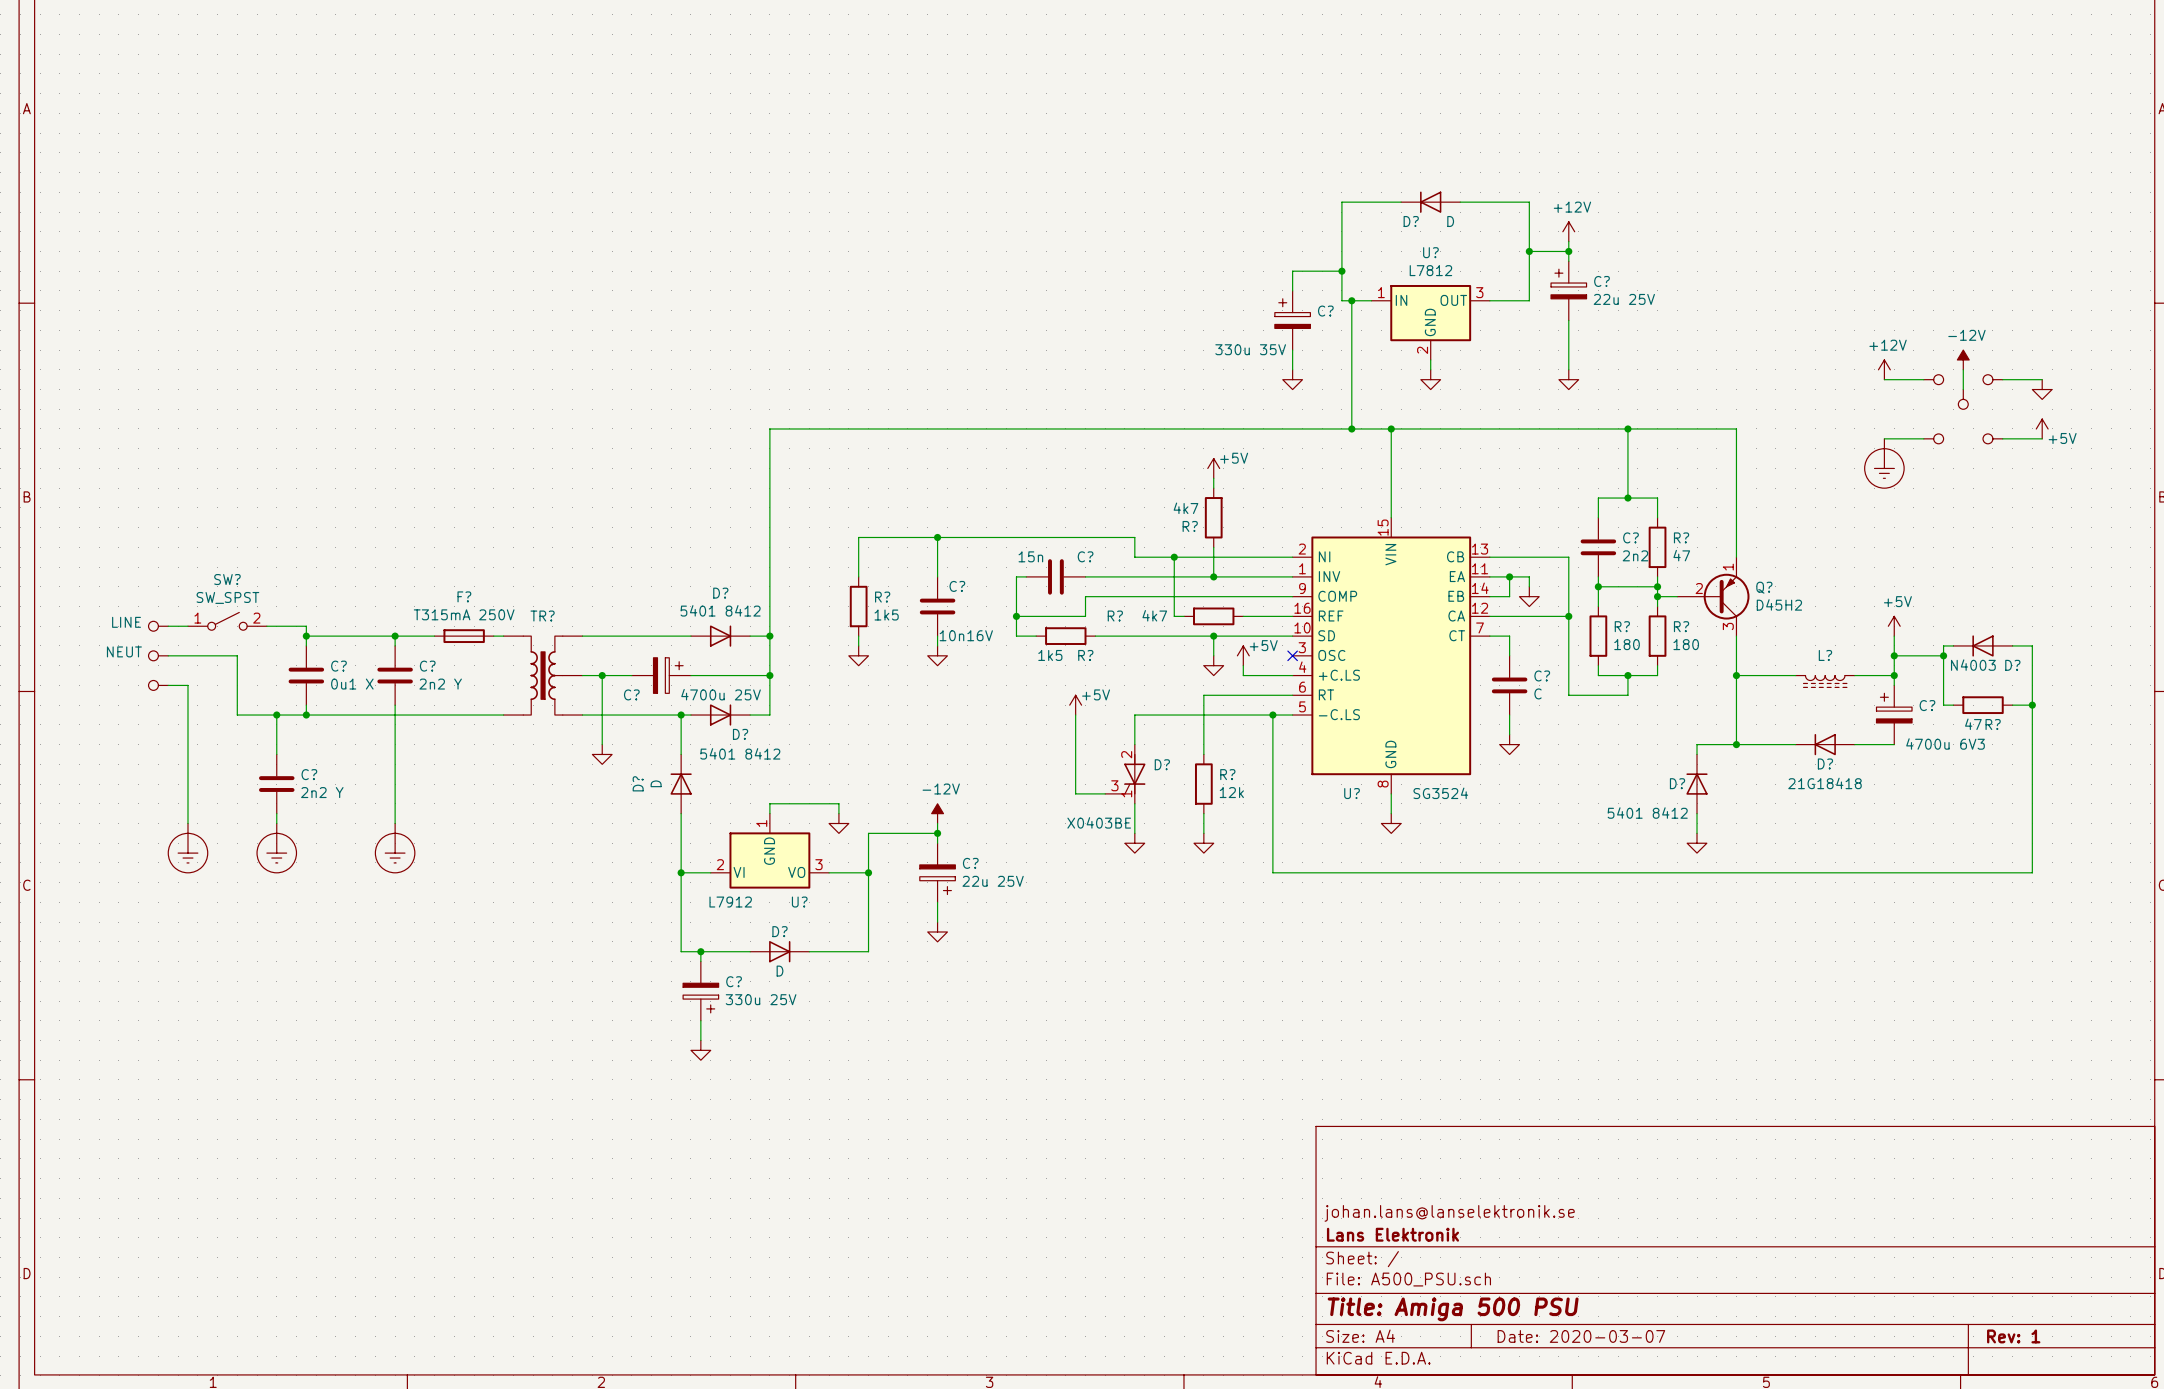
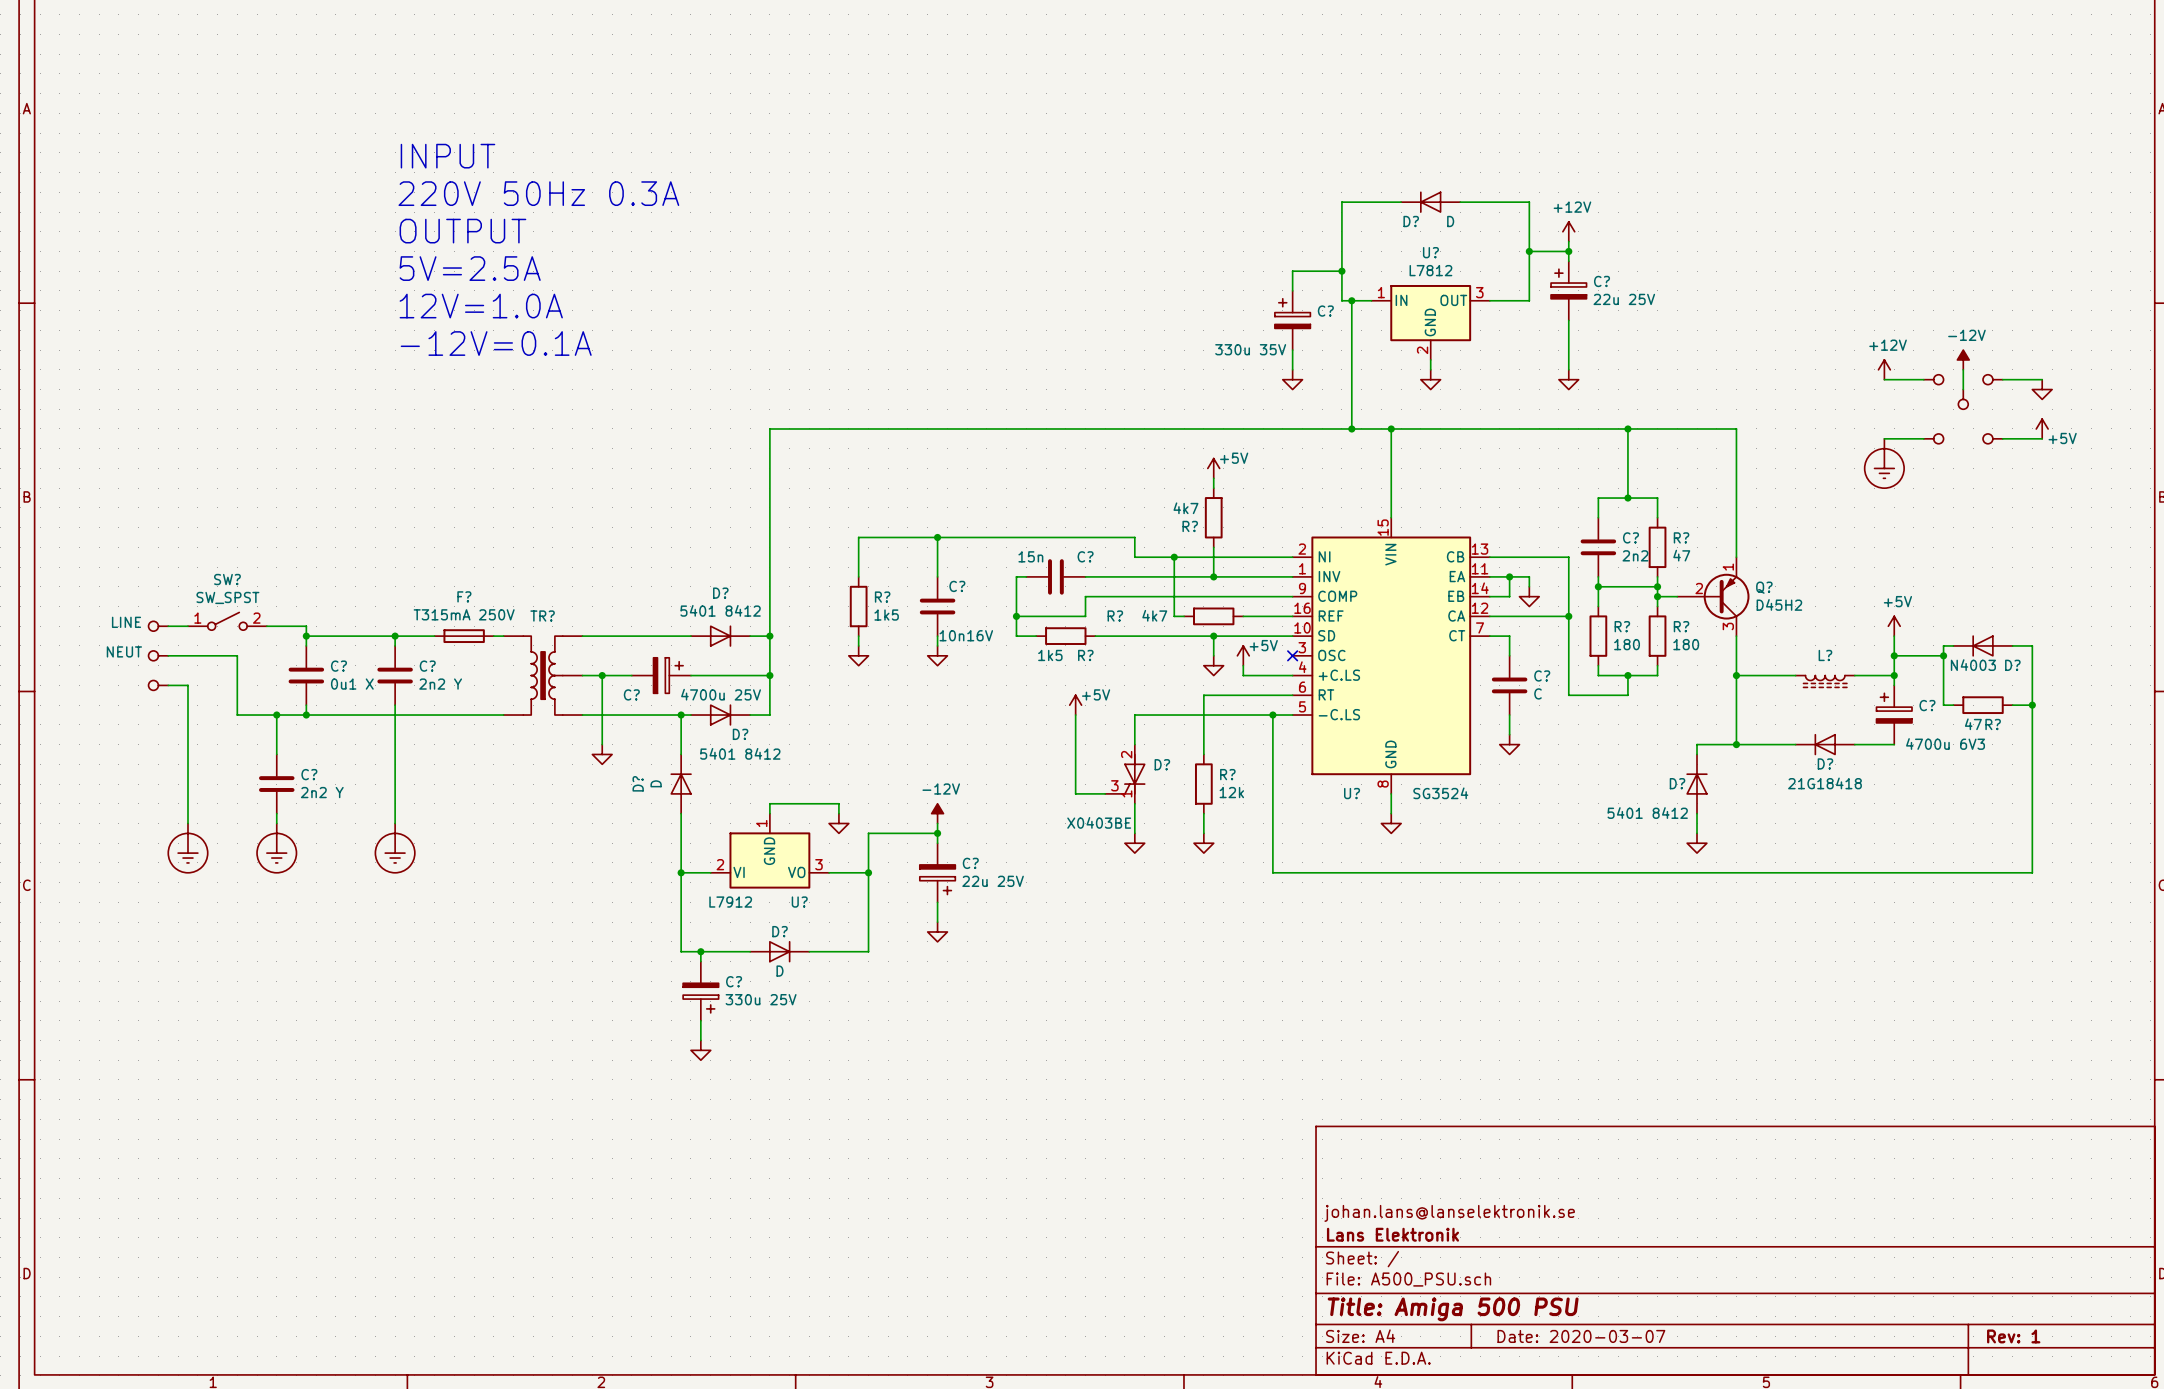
text: none -> INPUT (447, 156)
text: none -> 220V 50Hz 0.3A (538, 193)
text: none -> OUTPUT (462, 231)
text: none -> 5V=2.5A (470, 268)
text: none -> 12V=1.0A (481, 306)
text: none -> -12V=0.1A (496, 343)

